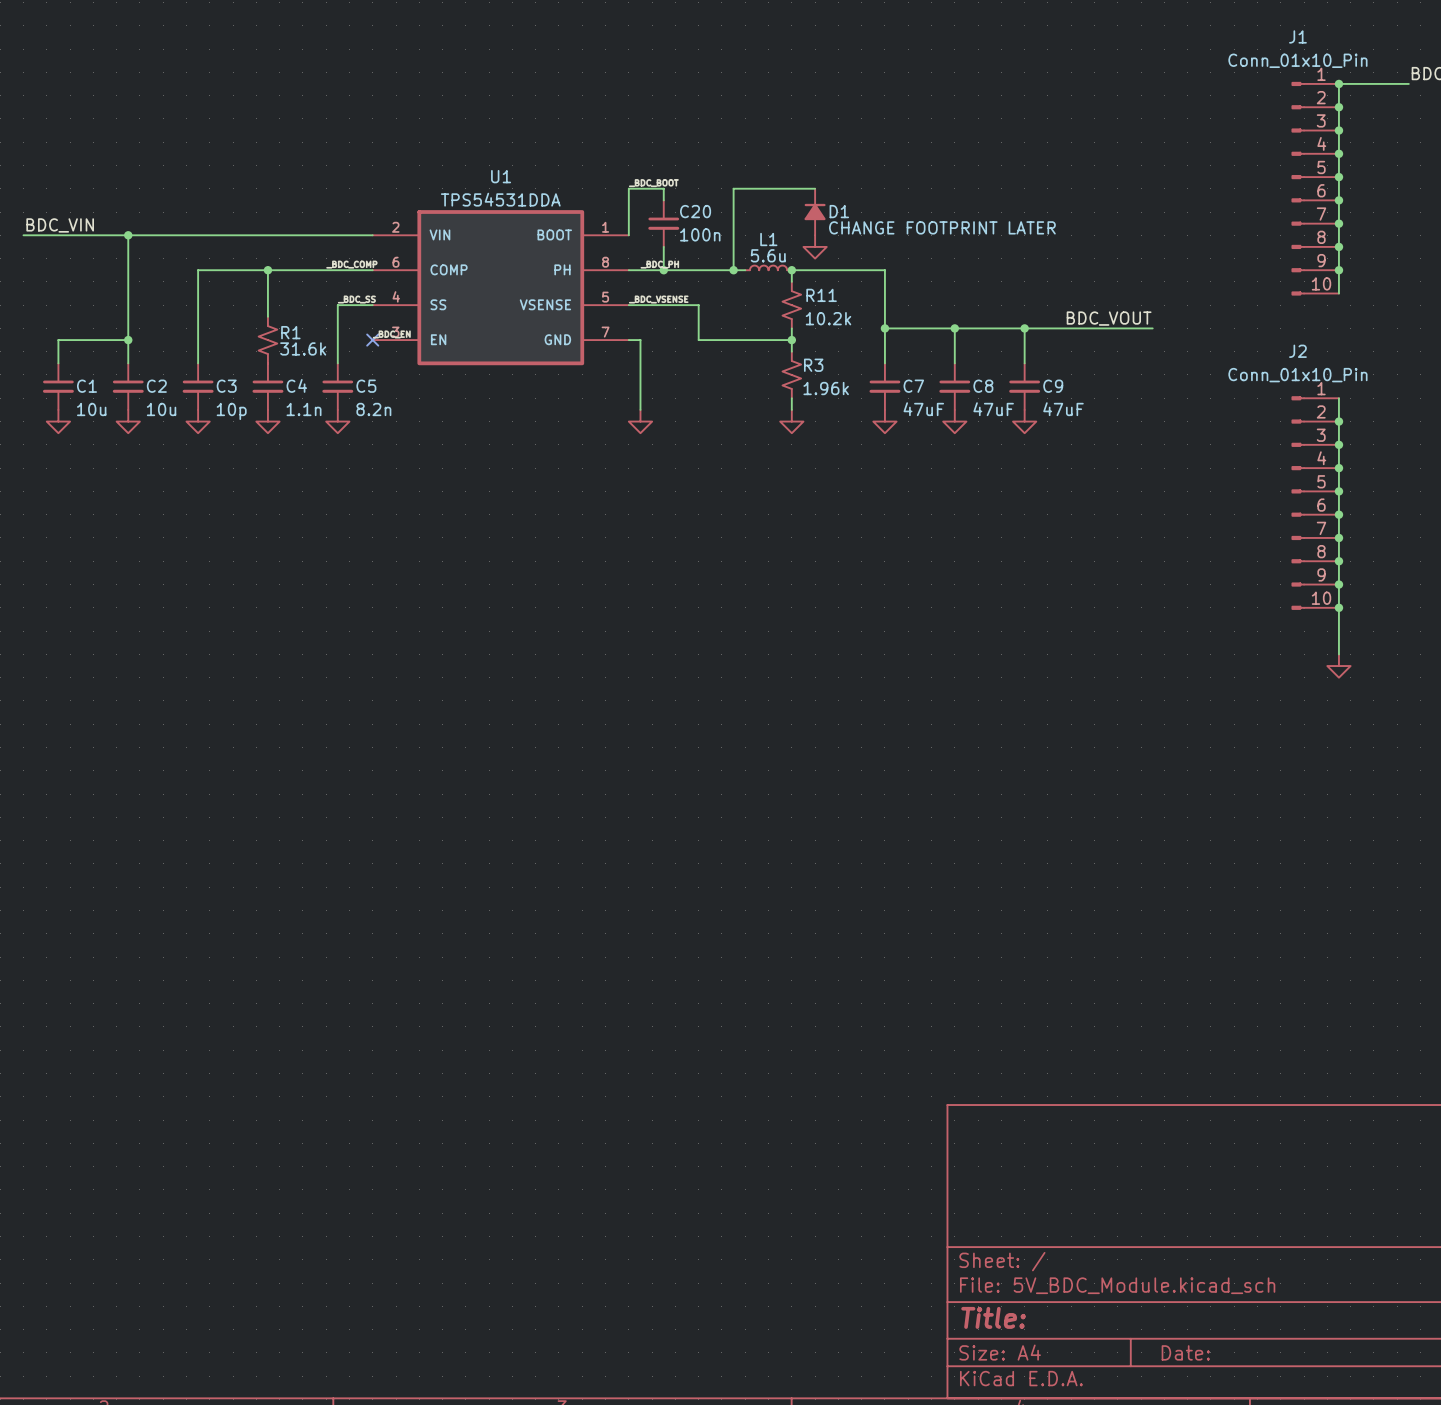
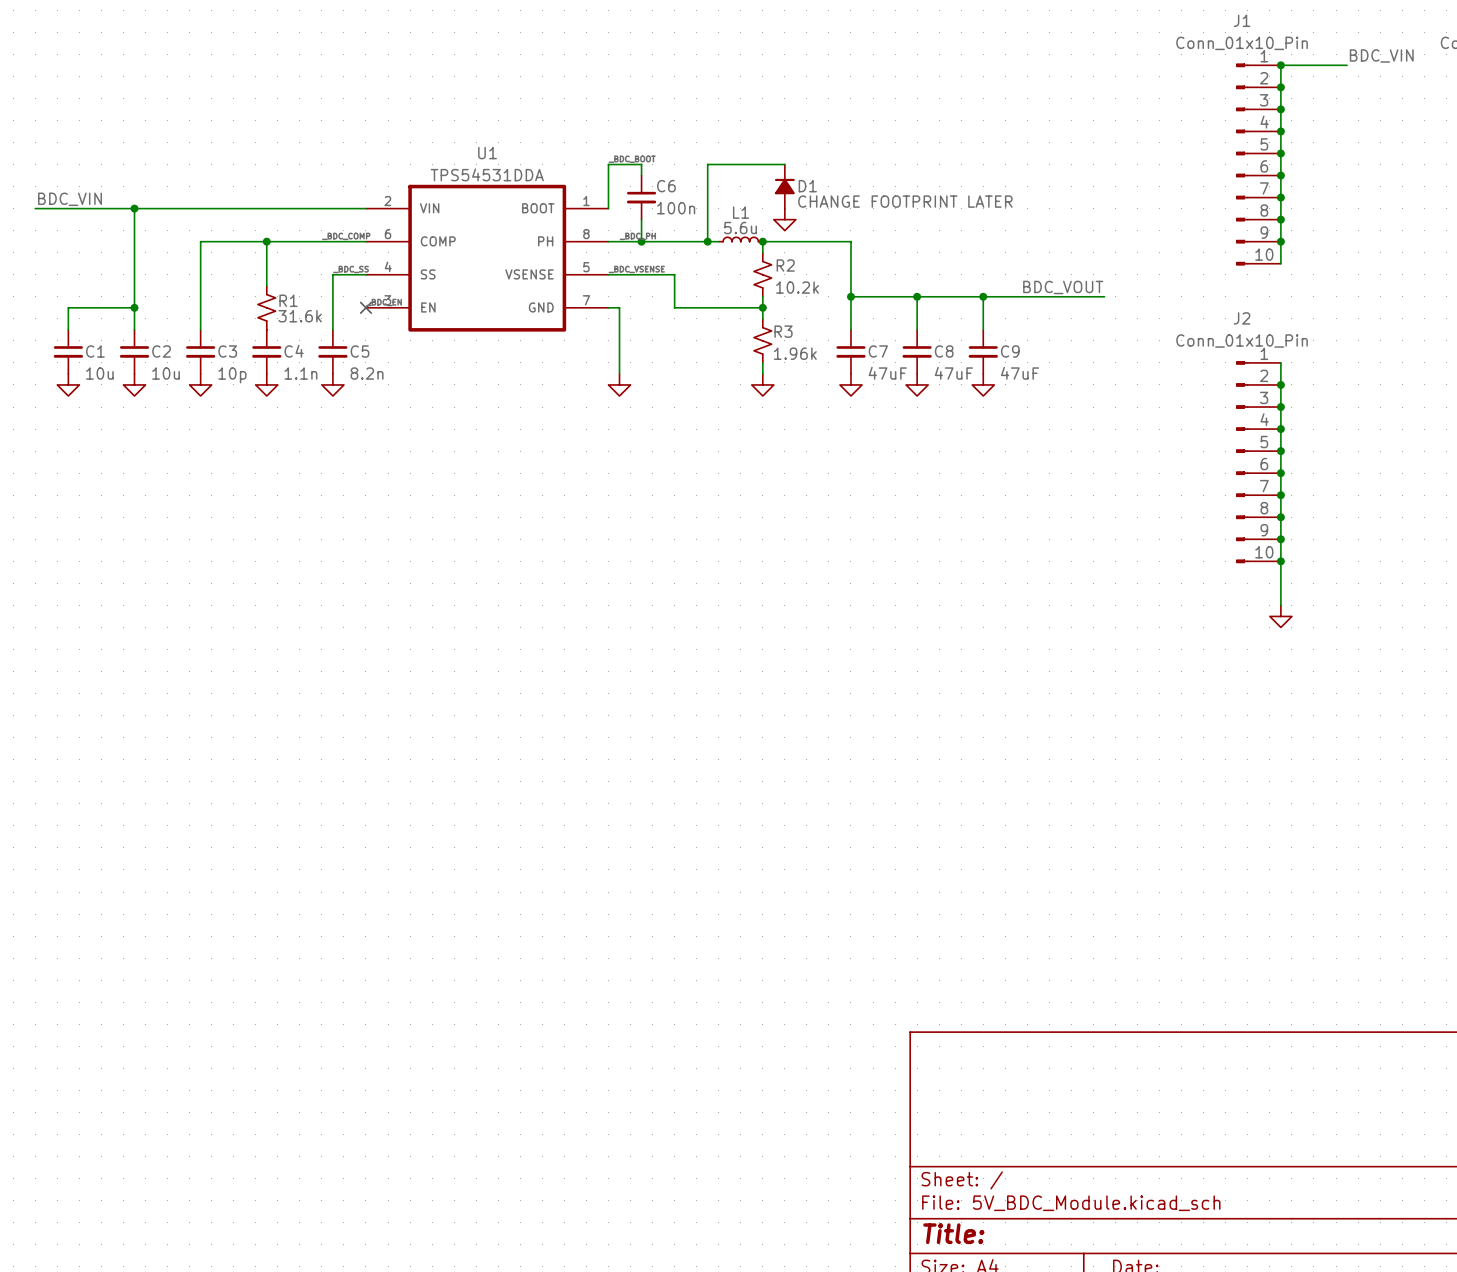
C20 name: C20 (695, 211) -> C6 (666, 186)
R11 name: R11 (821, 295) -> R2 (785, 265)

